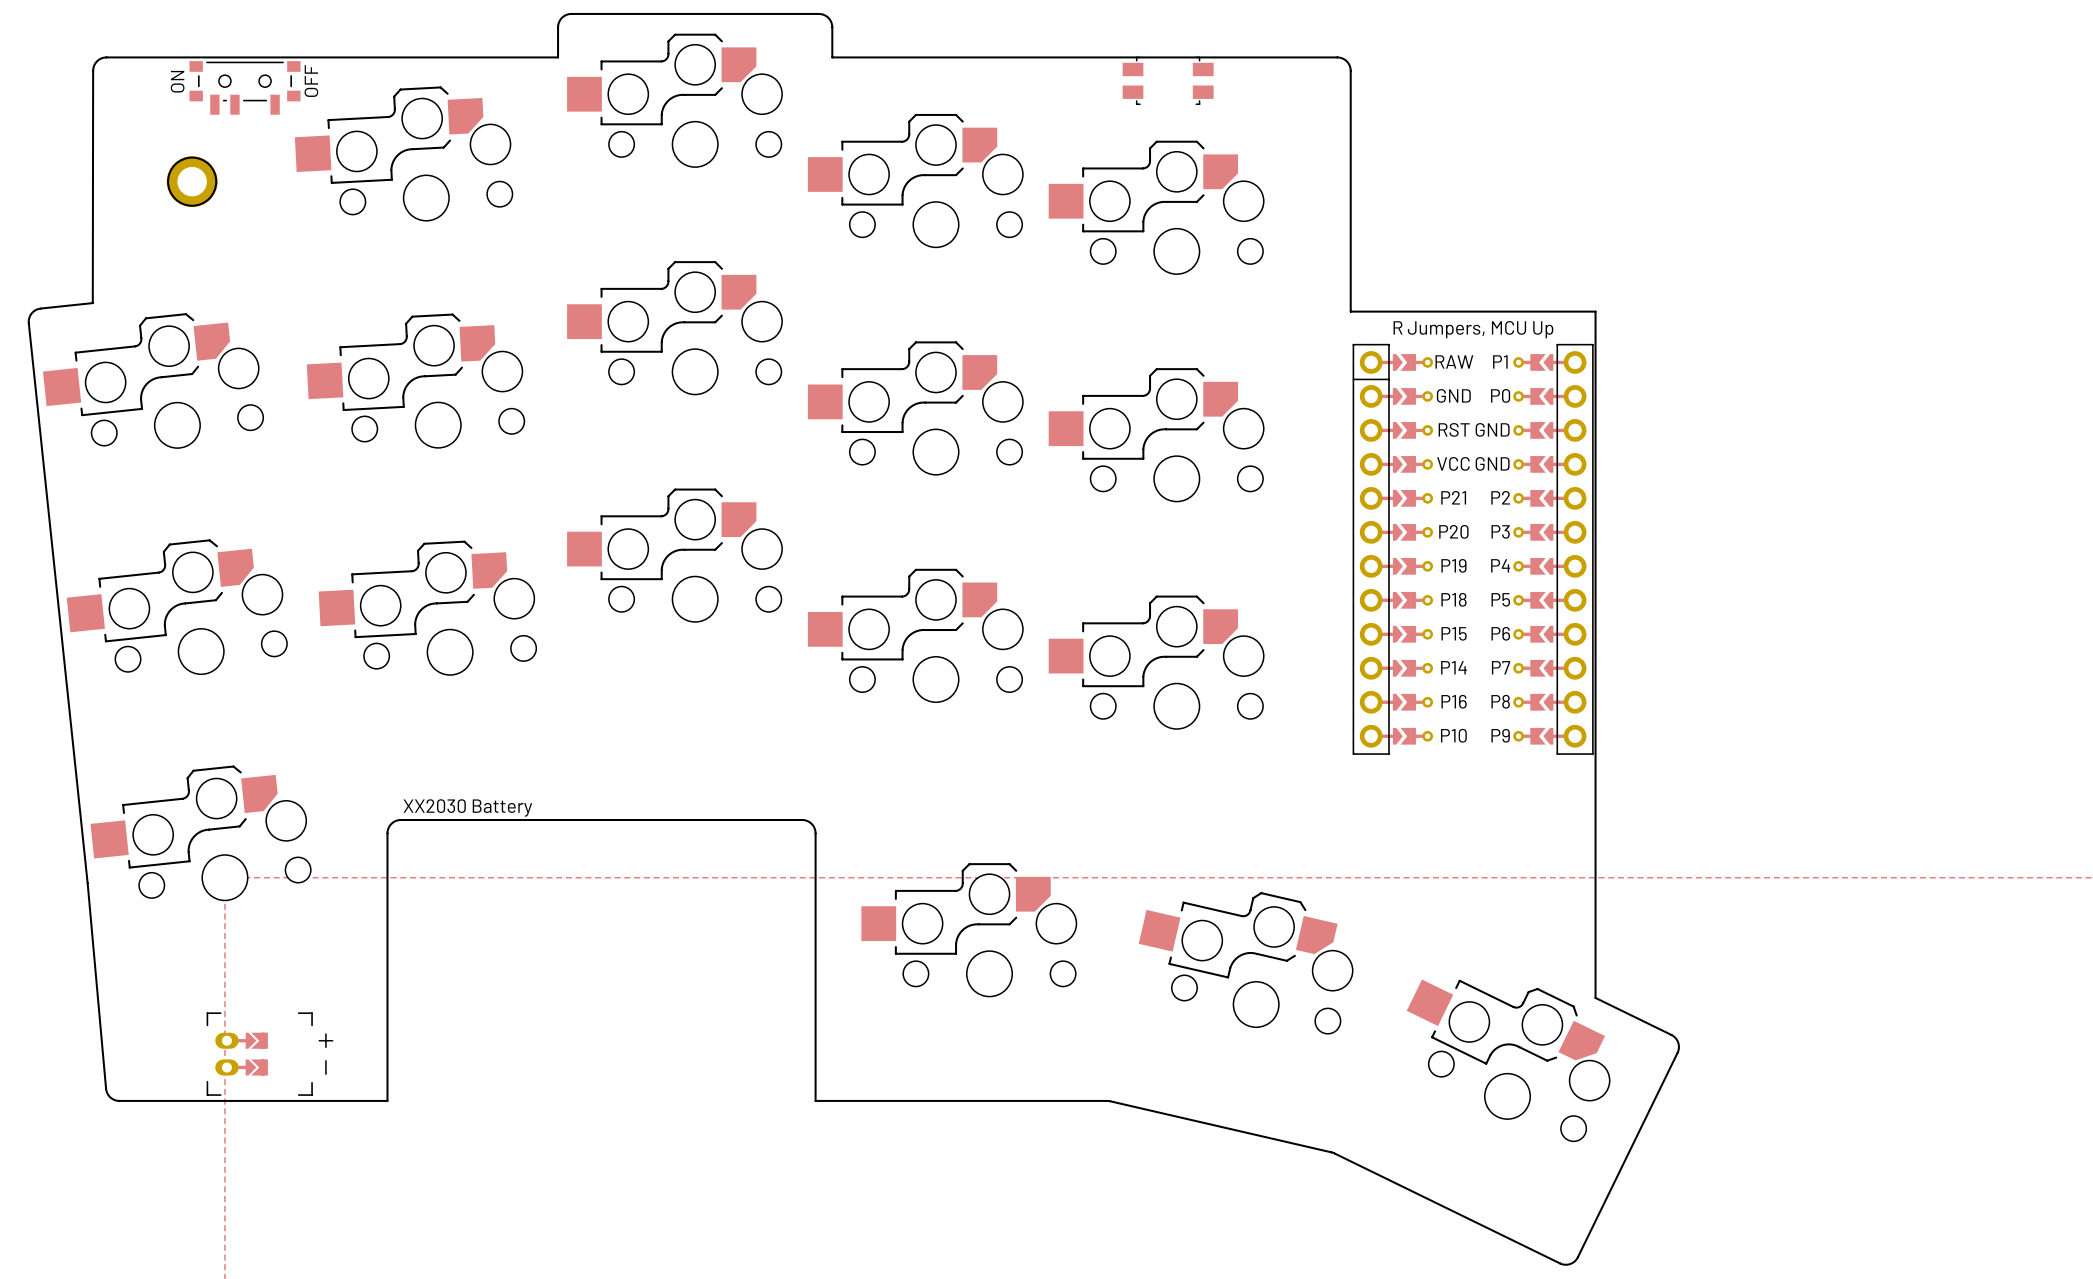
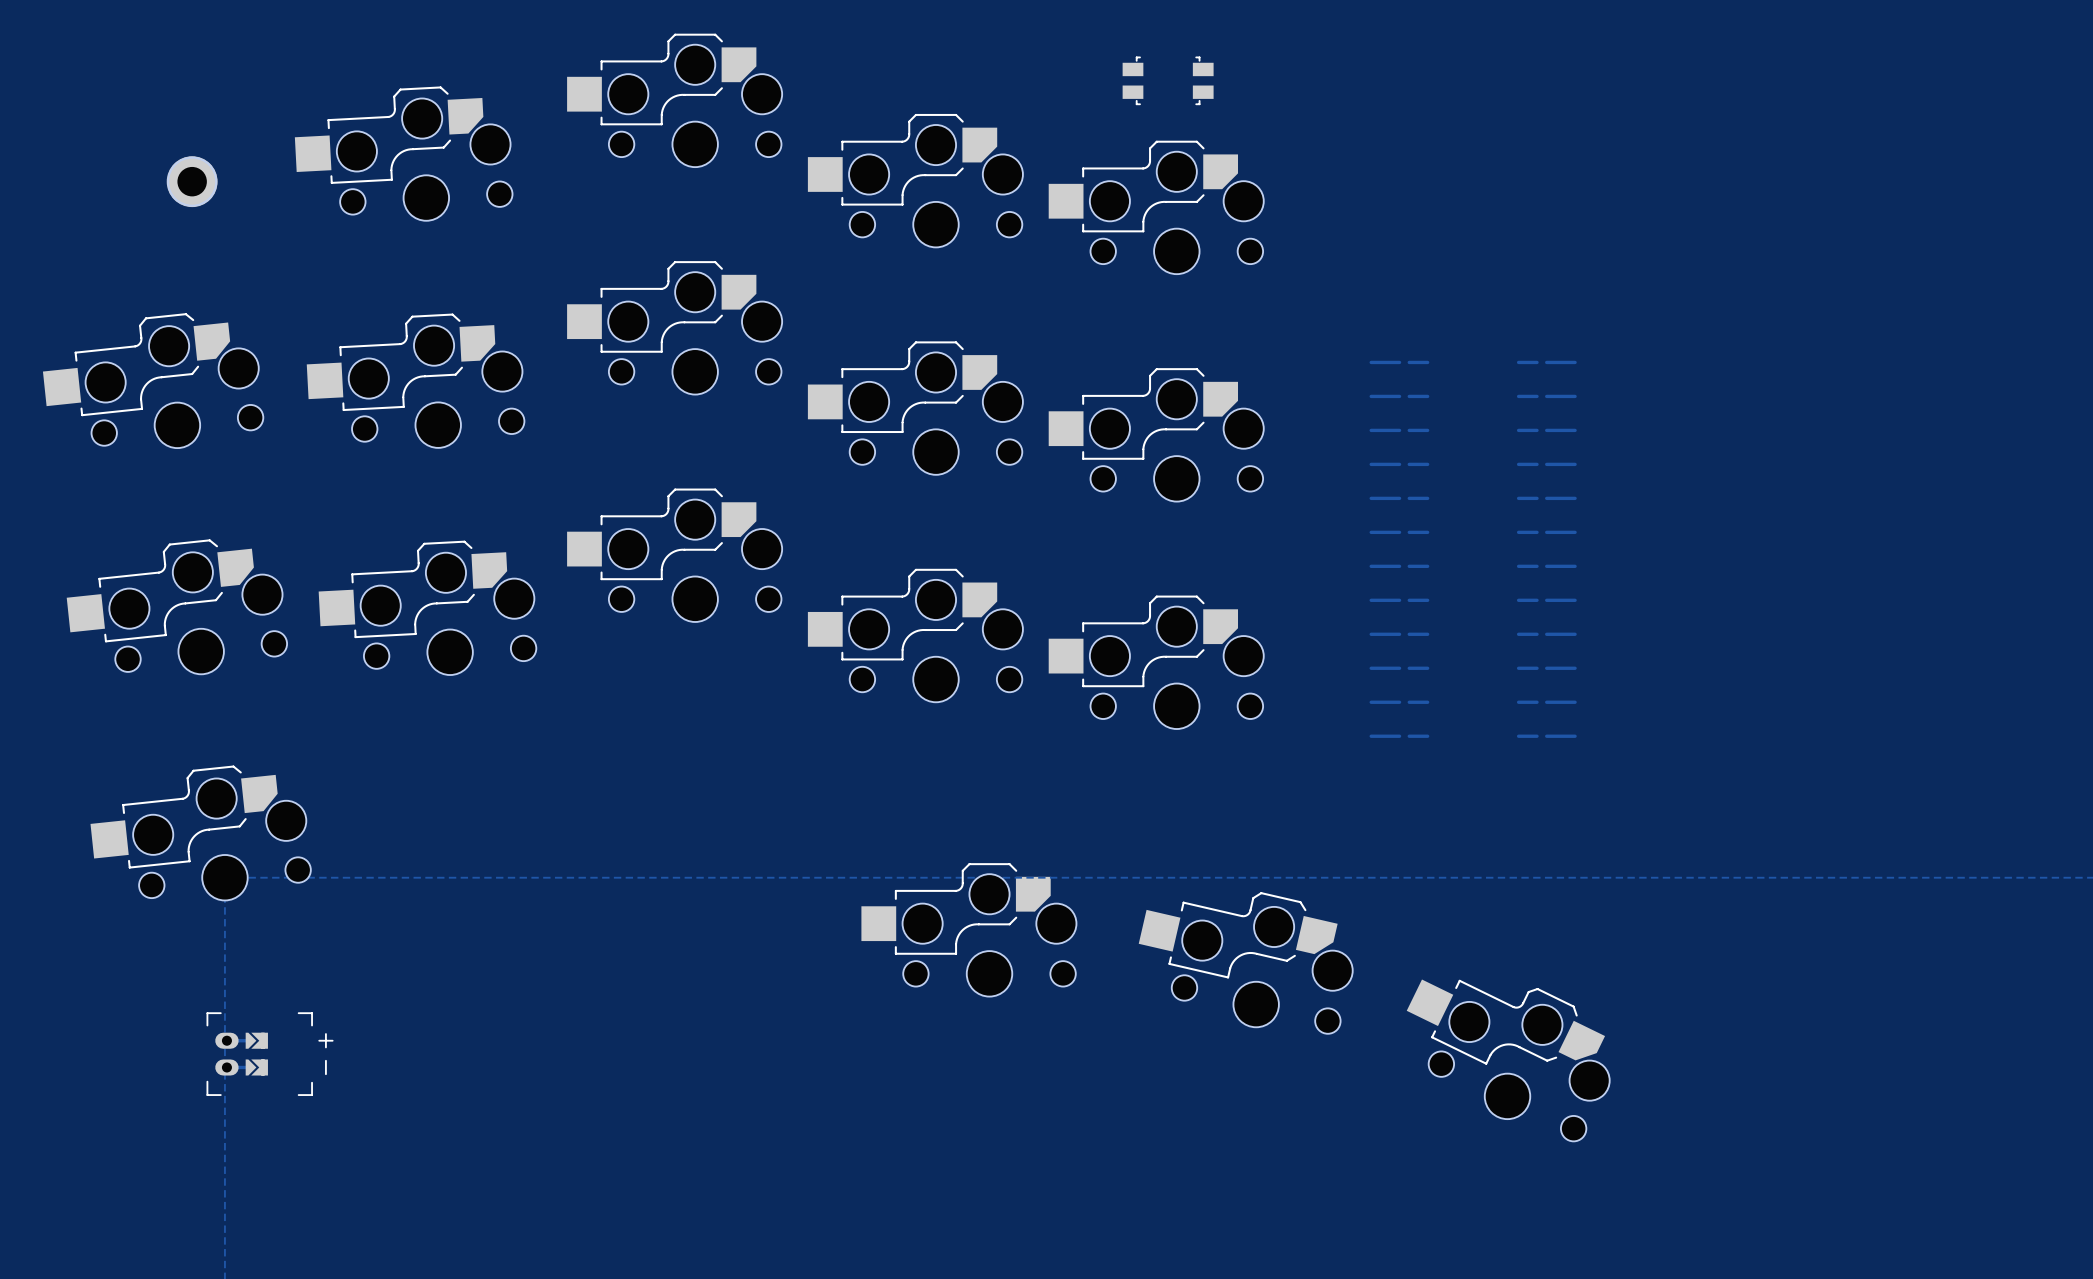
board edge: (571, 13) (820, 14) (827, 16) (831, 24) (832, 57) (1341, 58) (1347, 62) (1350, 70) (1350, 311) (1595, 311) (1595, 997) (1672, 1035) (1677, 1041) (1678, 1047) (1574, 1261) (1567, 1264) (1560, 1263) (1333, 1152) (1110, 1101) (815, 1100) (815, 833) (812, 825) (803, 820) (396, 820) (389, 826) (387, 833) (387, 1100) (119, 1100) (109, 1096) (106, 1088) (87, 883) (28, 321) (31, 313) (37, 309) (92, 303) (94, 65) (98, 60) (106, 57) (558, 57) (558, 22) (564, 15) (571, 13) -> none
part: (245, 87) -> none
part: (1473, 549) -> none
text: XX2030 Battery (467, 807) -> none

